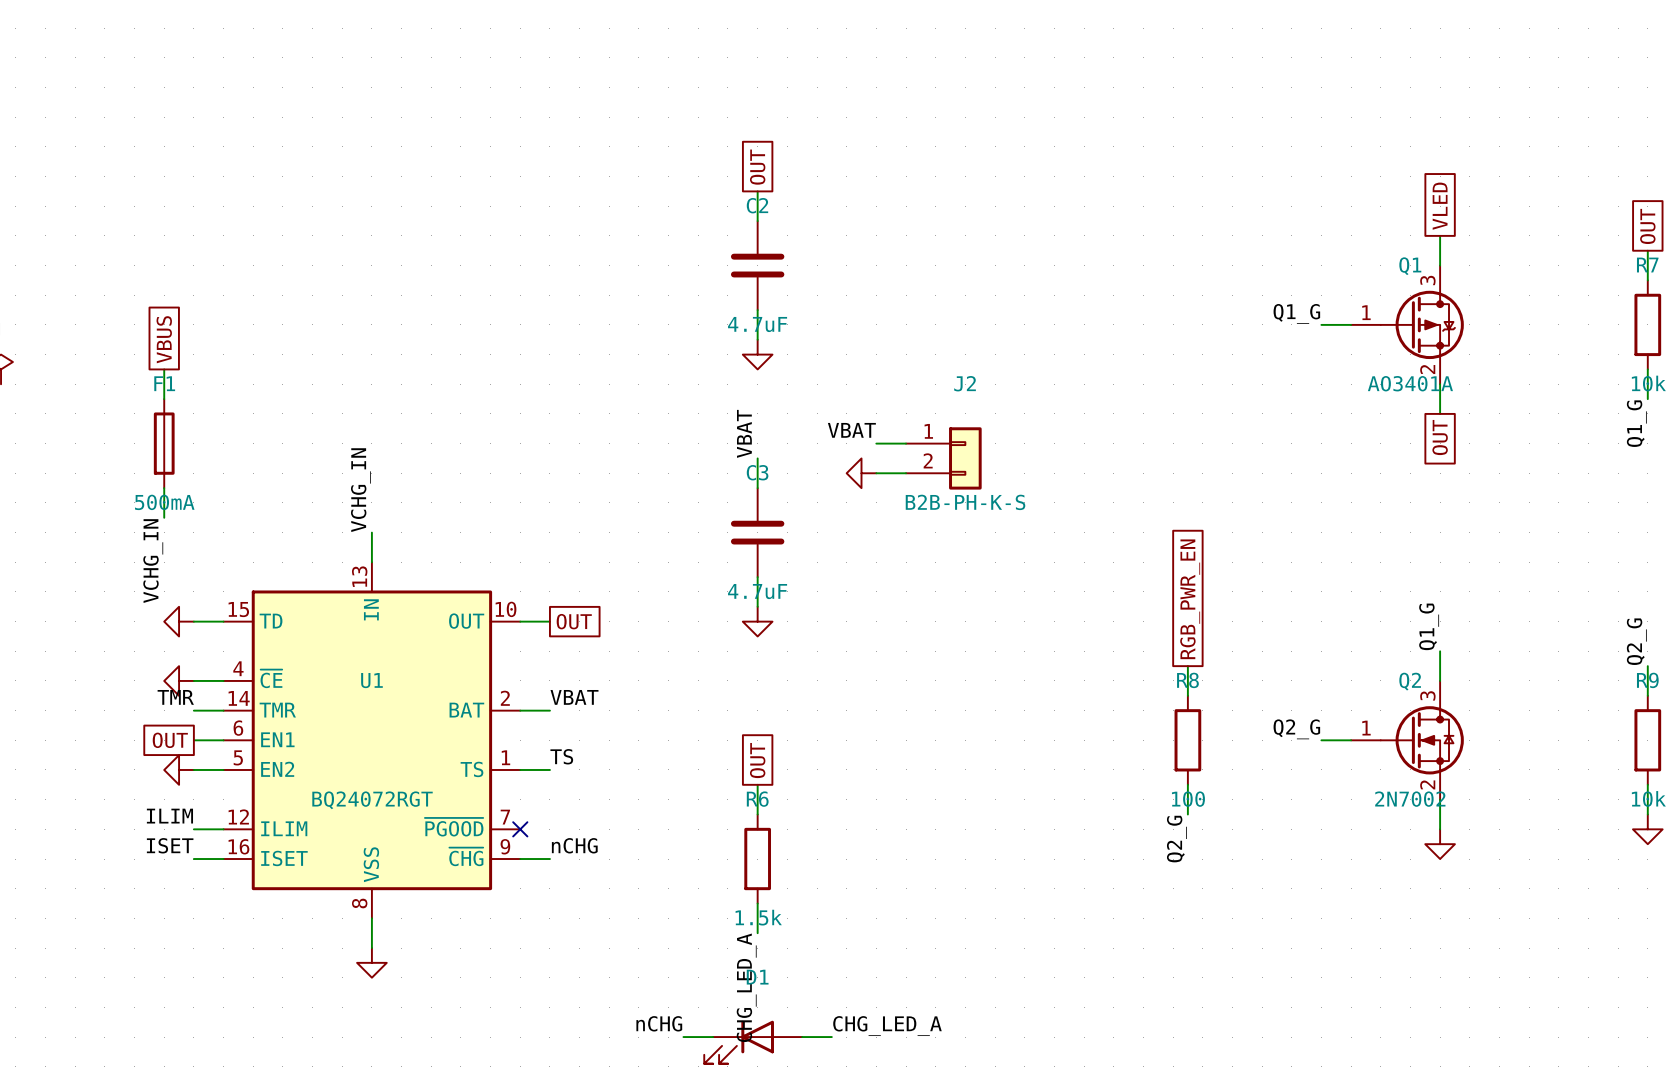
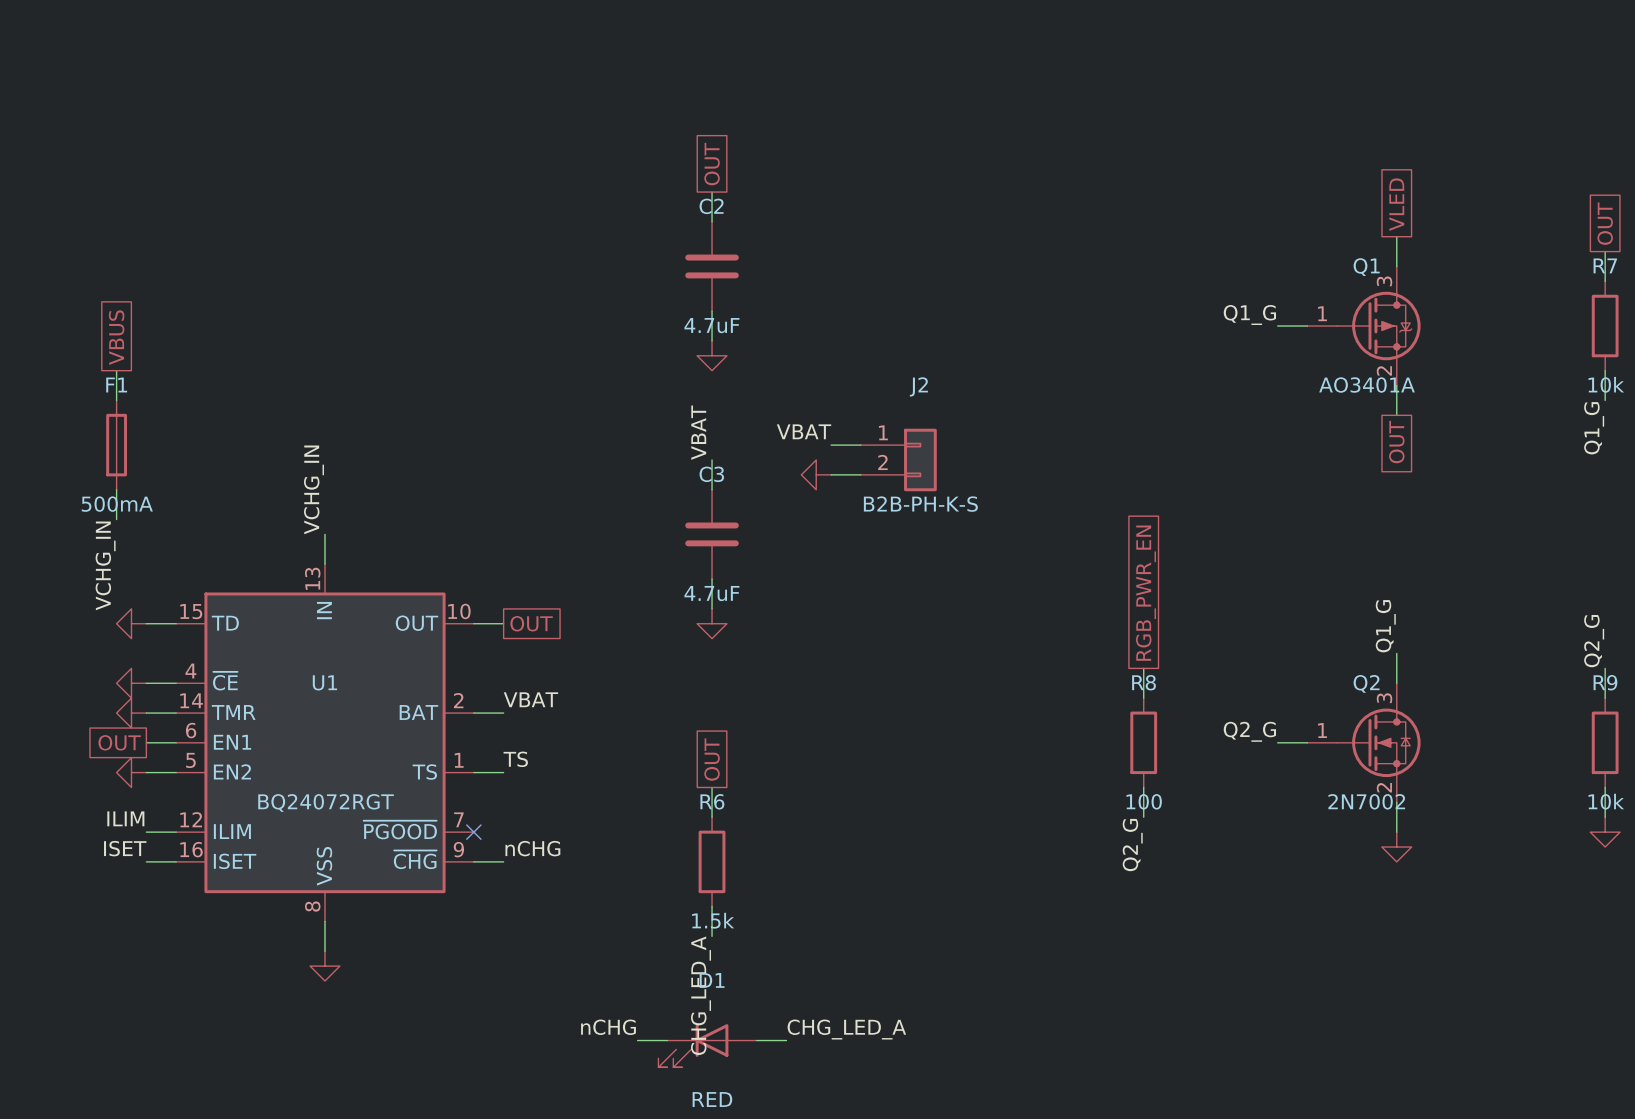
label: TMR (175, 697) -> none
power symbol: none -> (131, 713)

